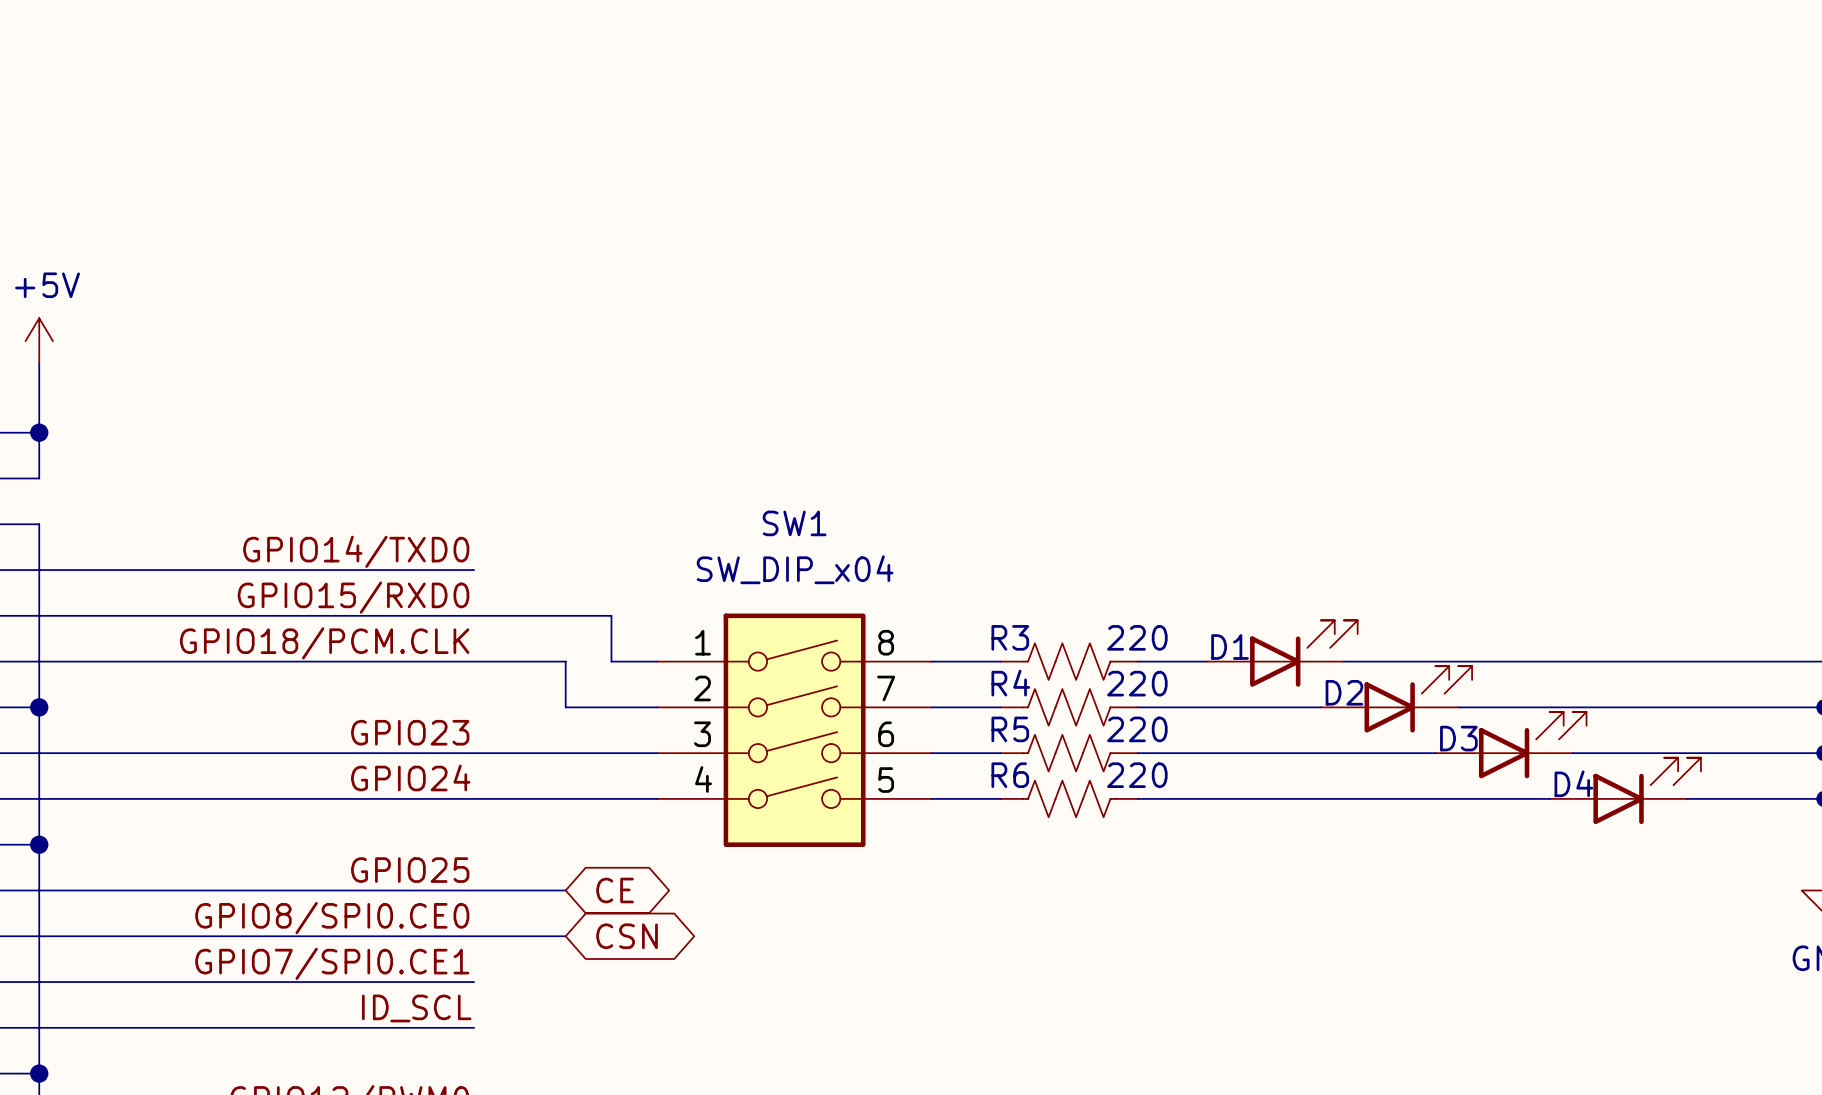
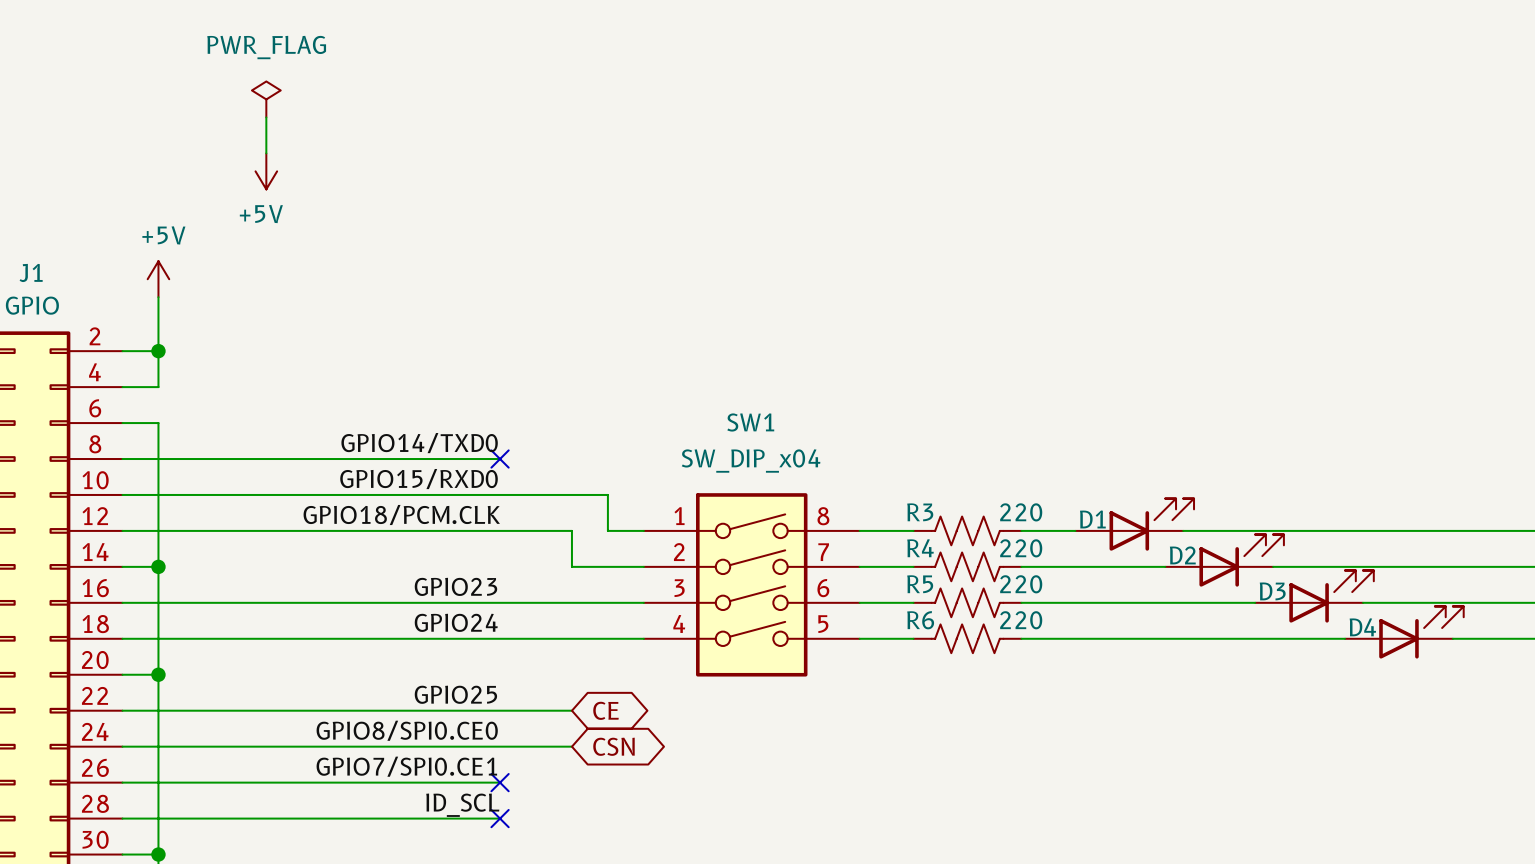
power symbol: none -> PWR_FLAG (266, 99)
wire: none -> (266, 117) (266, 153)
power symbol: none -> +5V (266, 171)
no-connect mark: none -> (500, 459)
no-connect mark: none -> (500, 782)
no-connect mark: none -> (500, 818)

